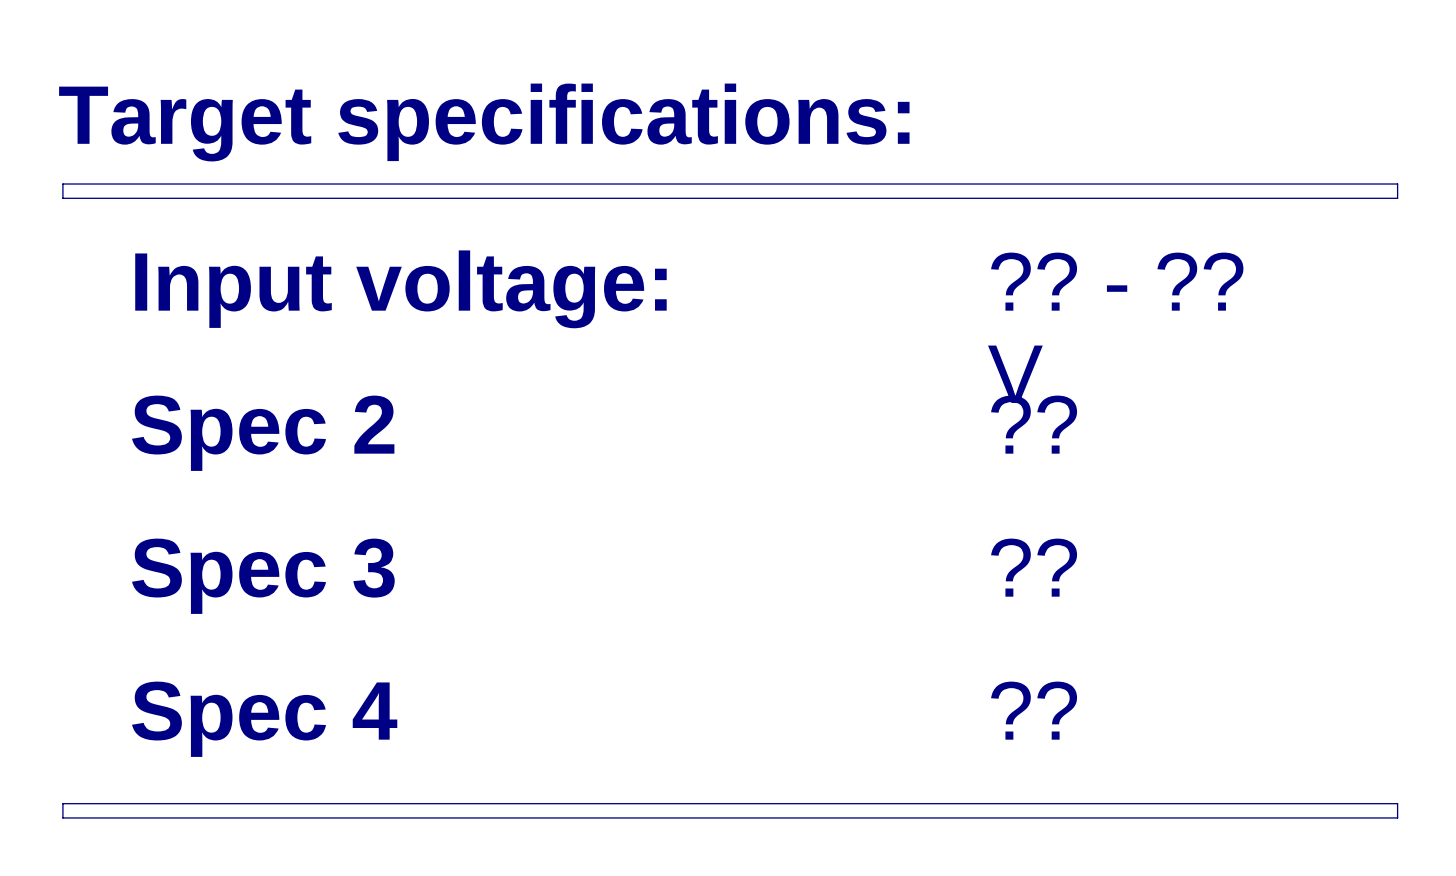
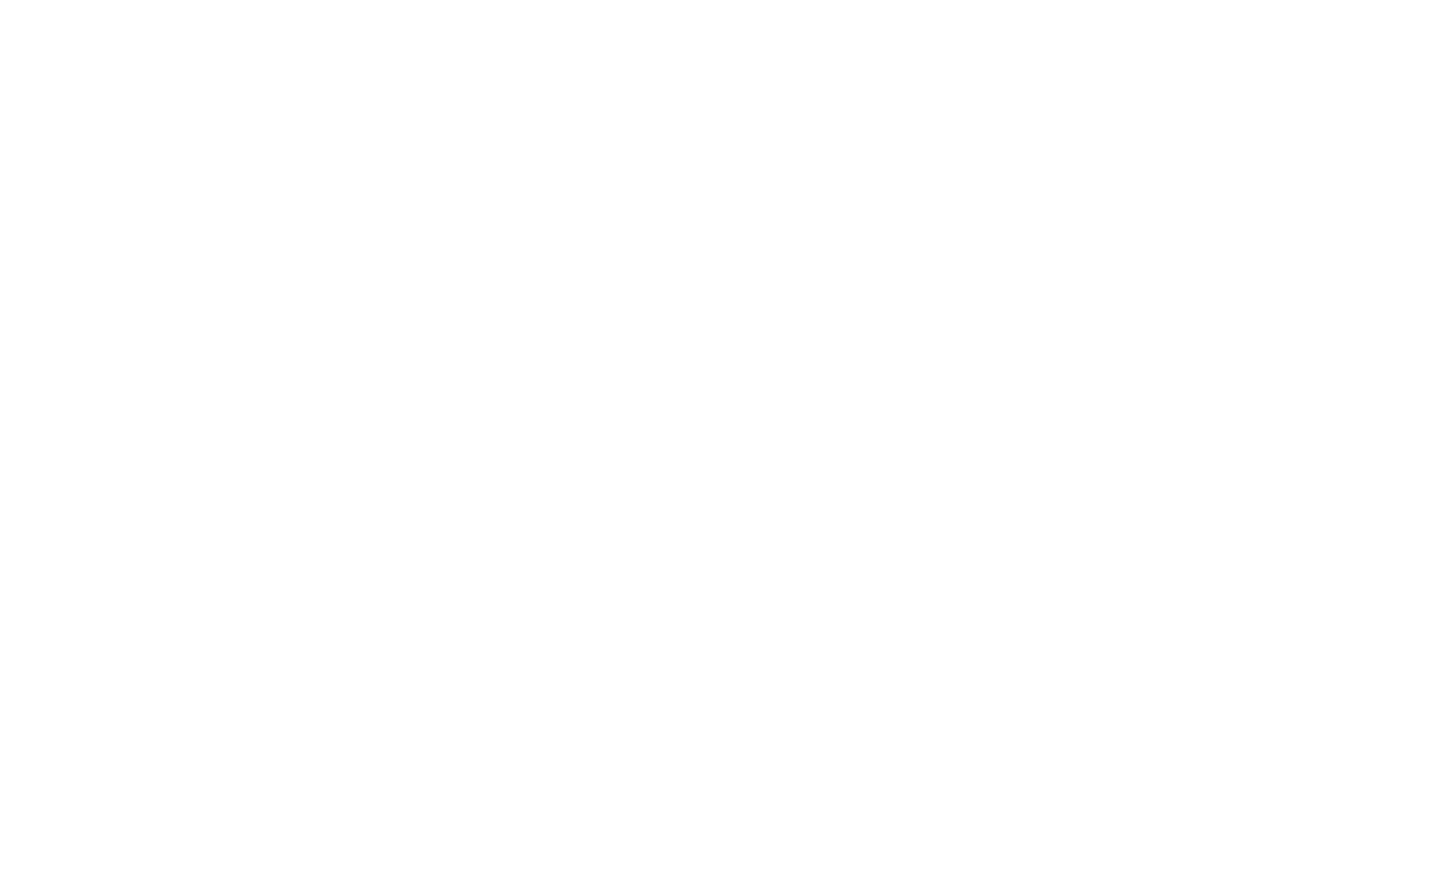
text: Target specifications: (484, 122) -> none
line: (62, 184) (62, 198) (1397, 198) (1397, 184) (62, 184) -> none
text: ?? - ?? (1117, 281) -> none
text: Input voltage: (400, 289) -> none
text: V (1015, 374) -> none
text: ?? (1034, 424) -> none
text: Spec 2 (263, 433) -> none
text: ?? (1034, 567) -> none
text: Spec 3 (263, 576) -> none
text: ?? (1034, 710) -> none
text: Spec 4 (264, 719) -> none
line: (62, 803) (1397, 803) (1397, 817) (62, 817) (62, 803) -> none

